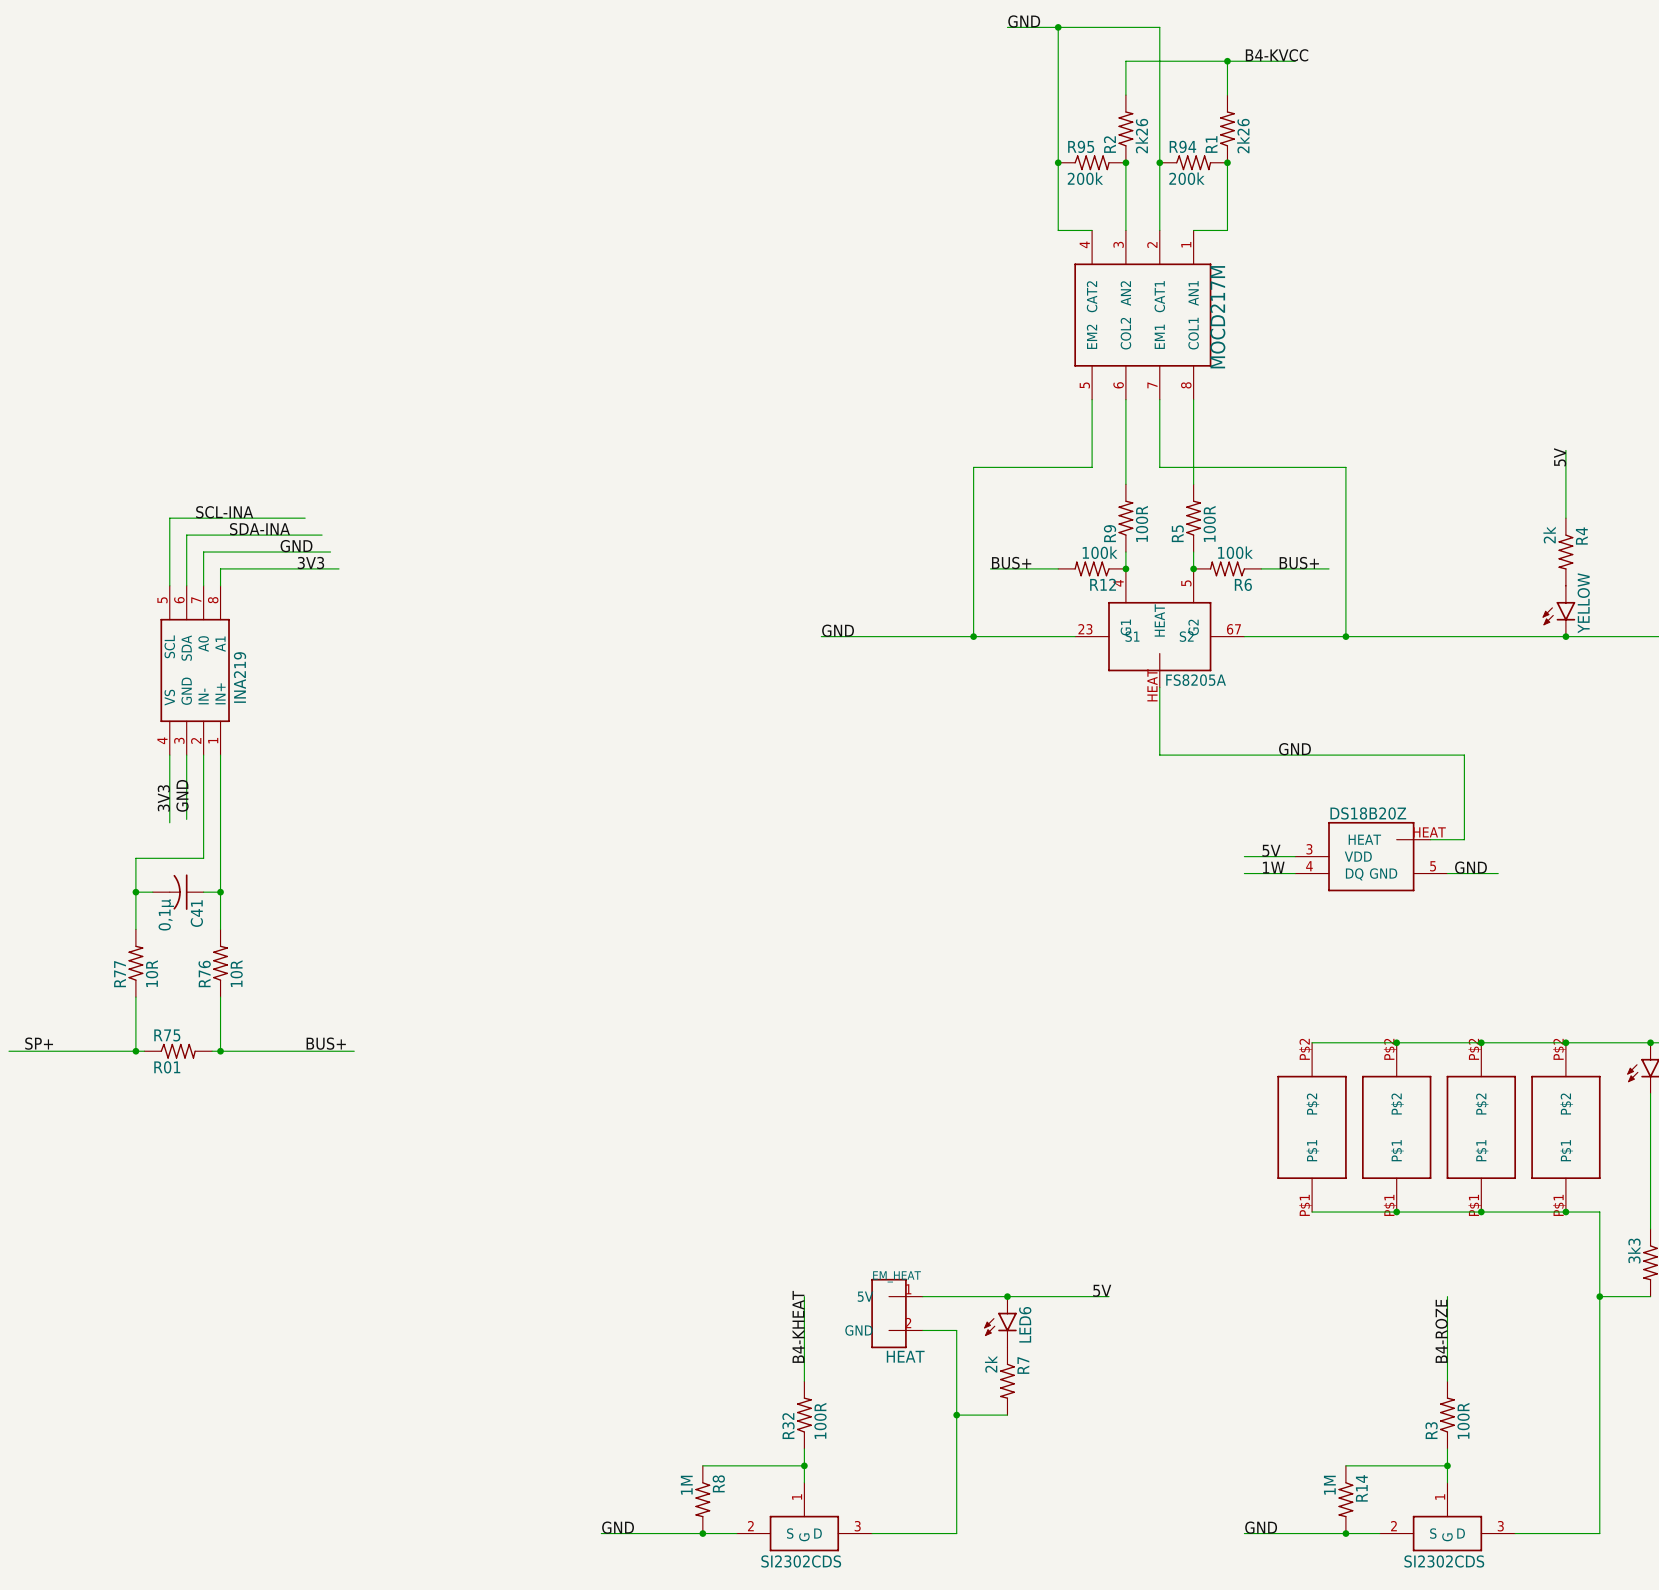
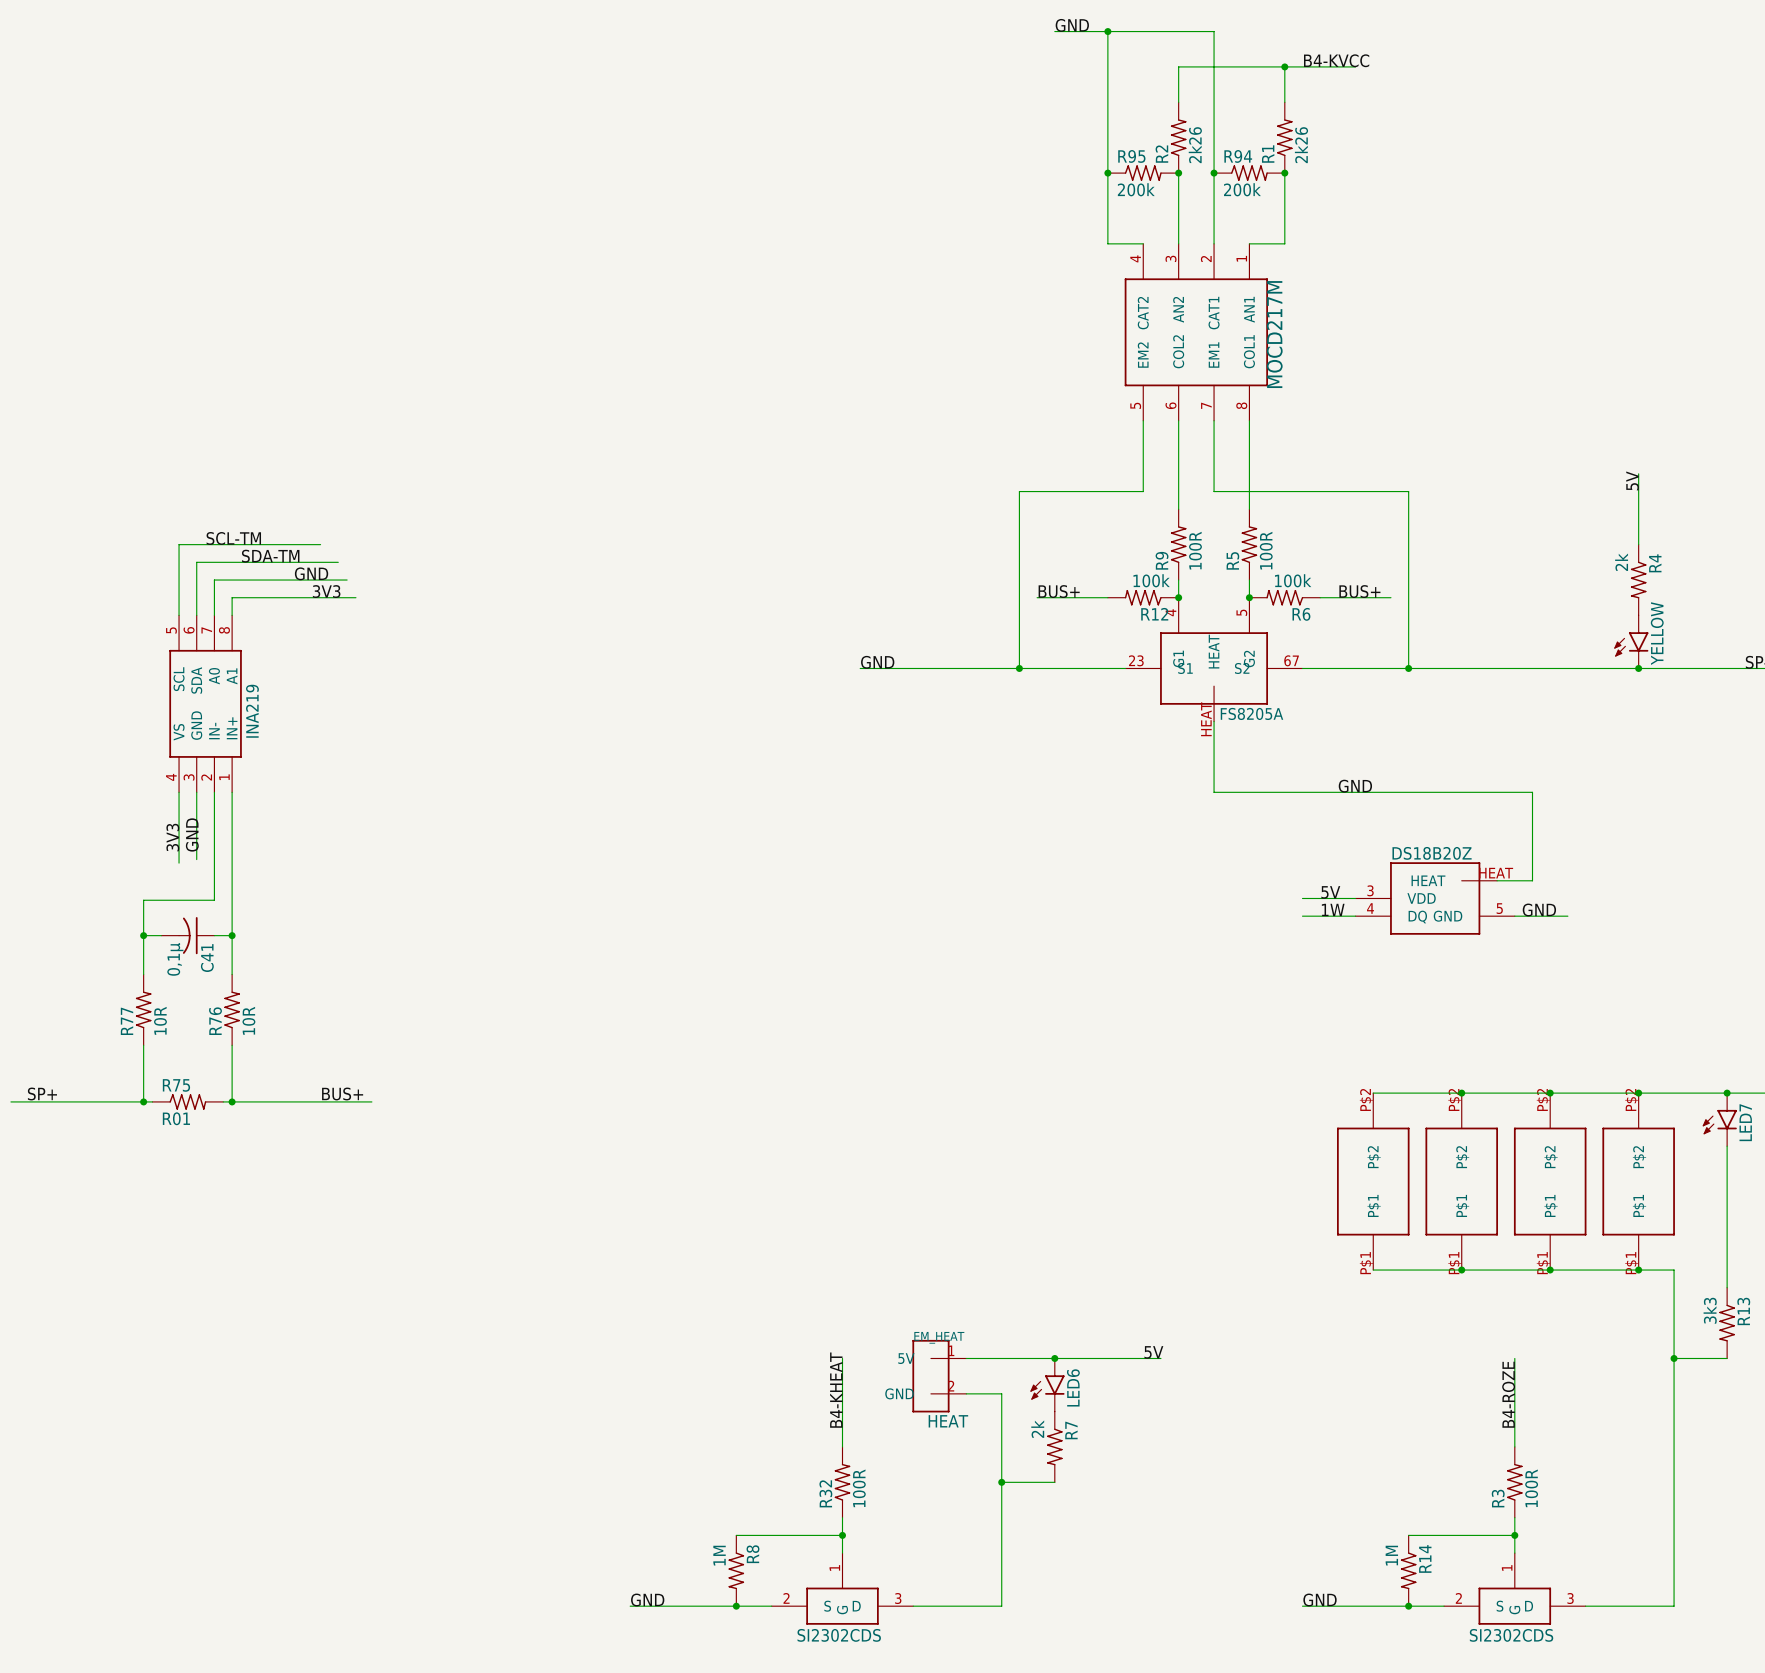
label: SCL-INA (224, 512) -> SCL-TM (233, 538)
label: SDA-INA (259, 529) -> SDA-TM (270, 556)

